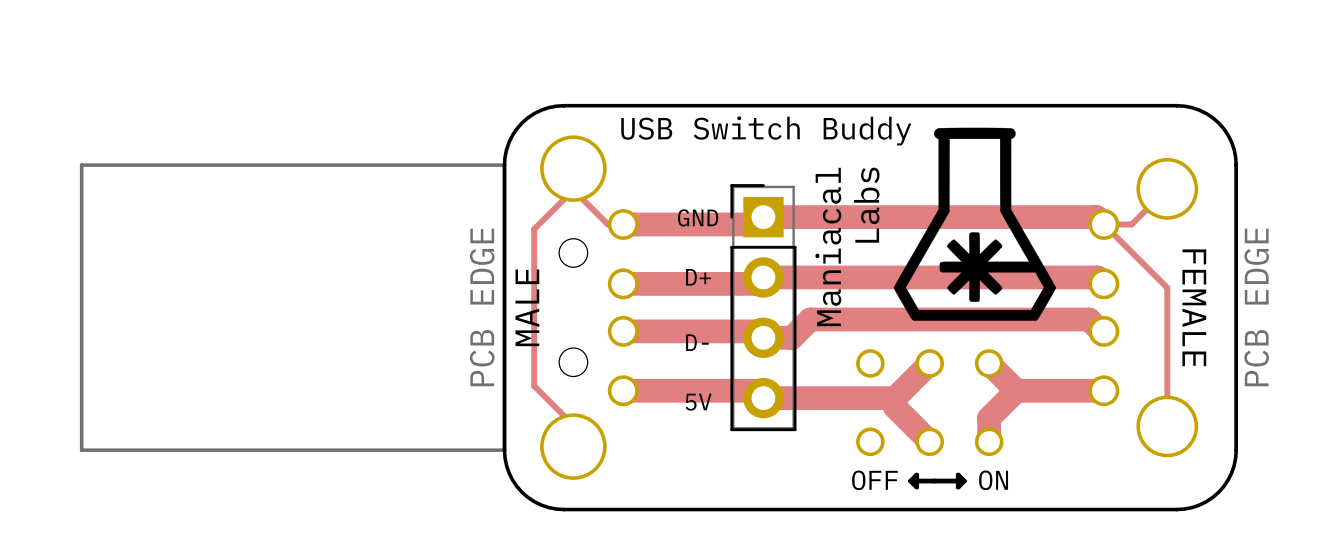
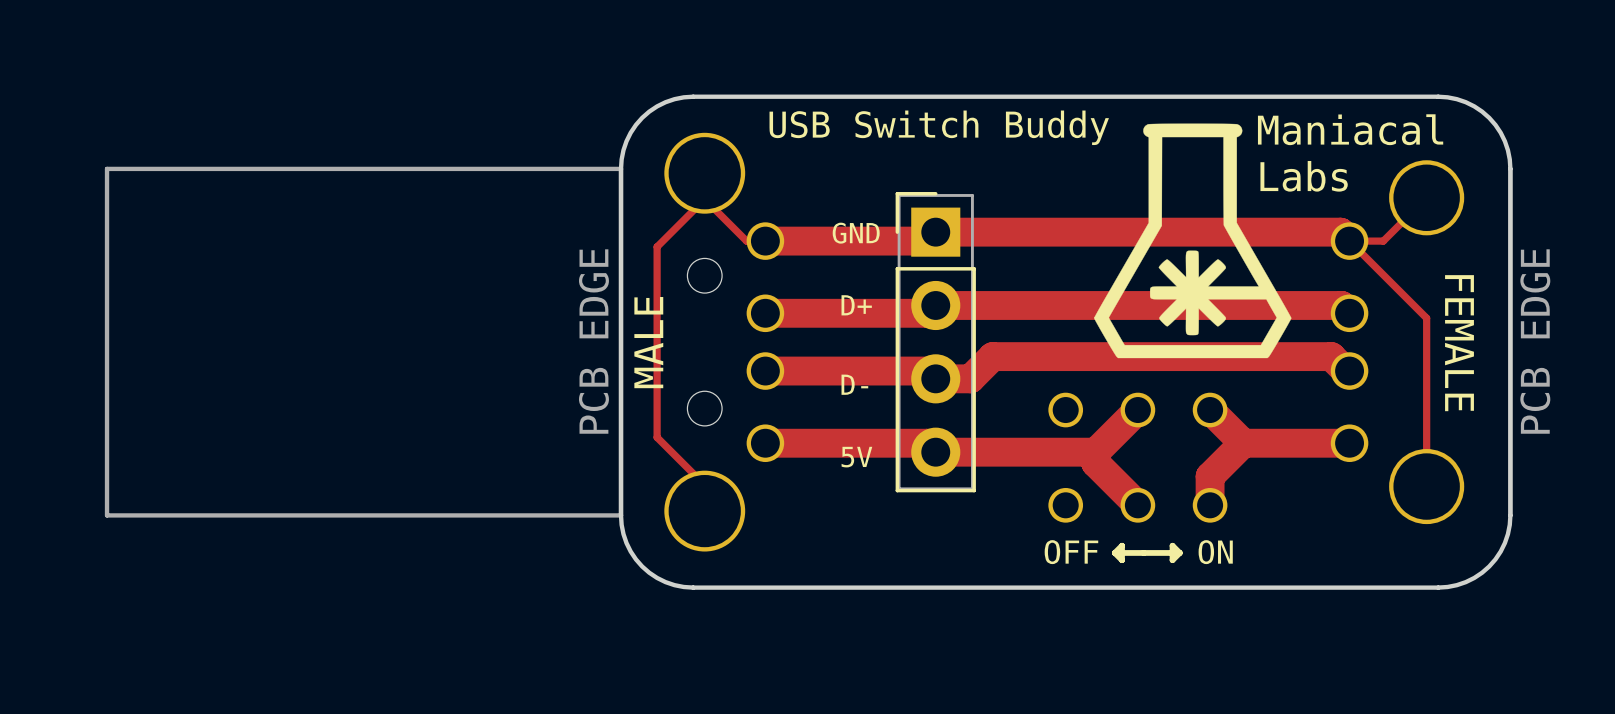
text rotation: 0° (866, 205) -> 90° clockwise (1304, 176)
text position: Labs (866, 205) -> Labs (1304, 176)
text rotation: 0° (828, 246) -> 90° clockwise (1350, 129)
text position: Maniacal (828, 246) -> Maniacal (1350, 129)

